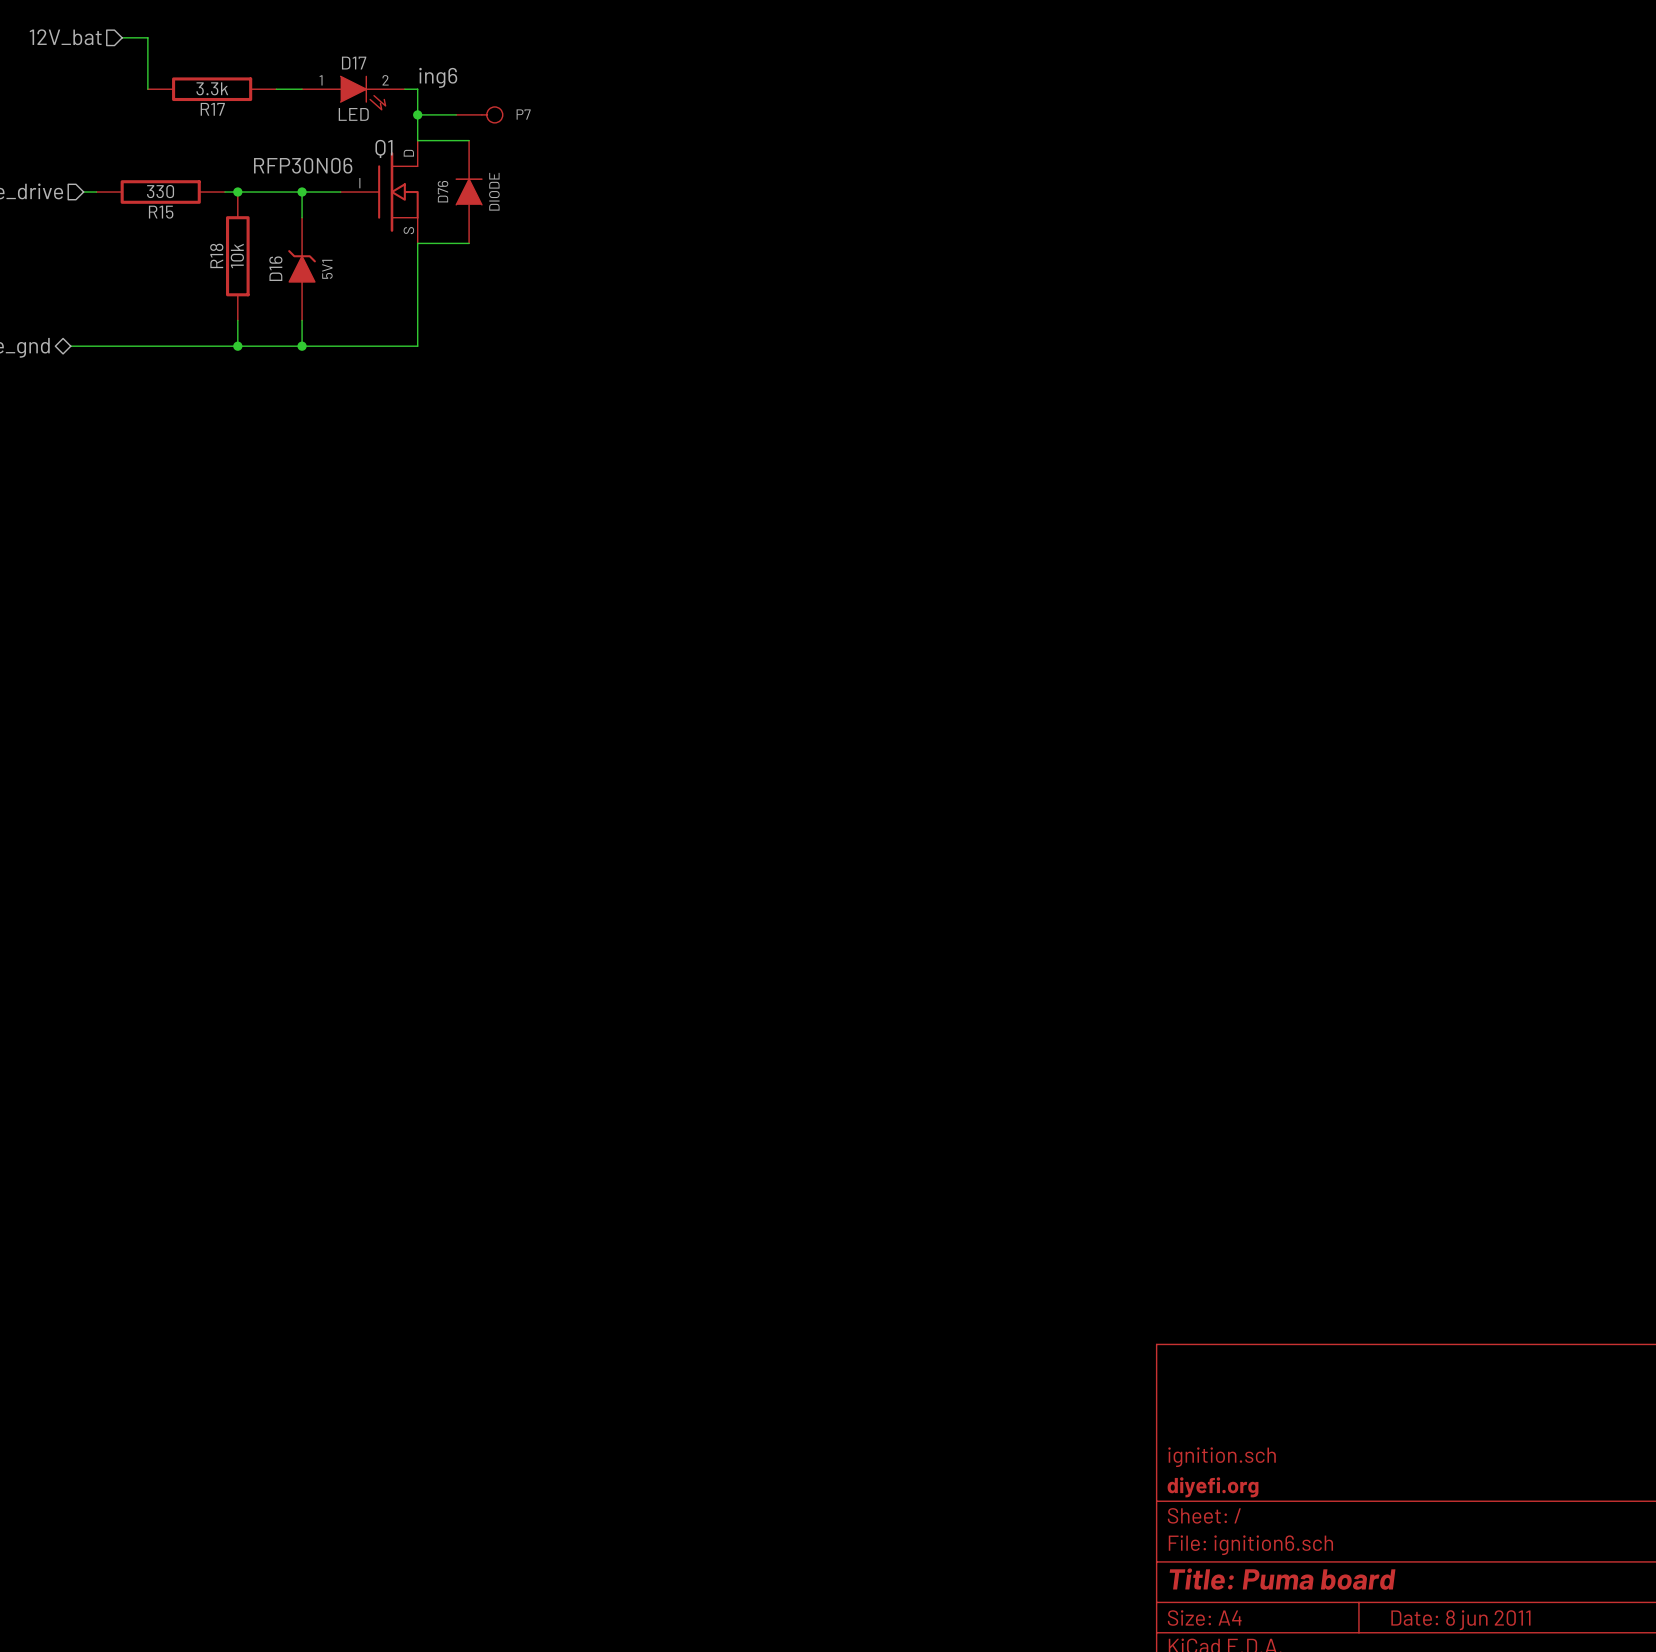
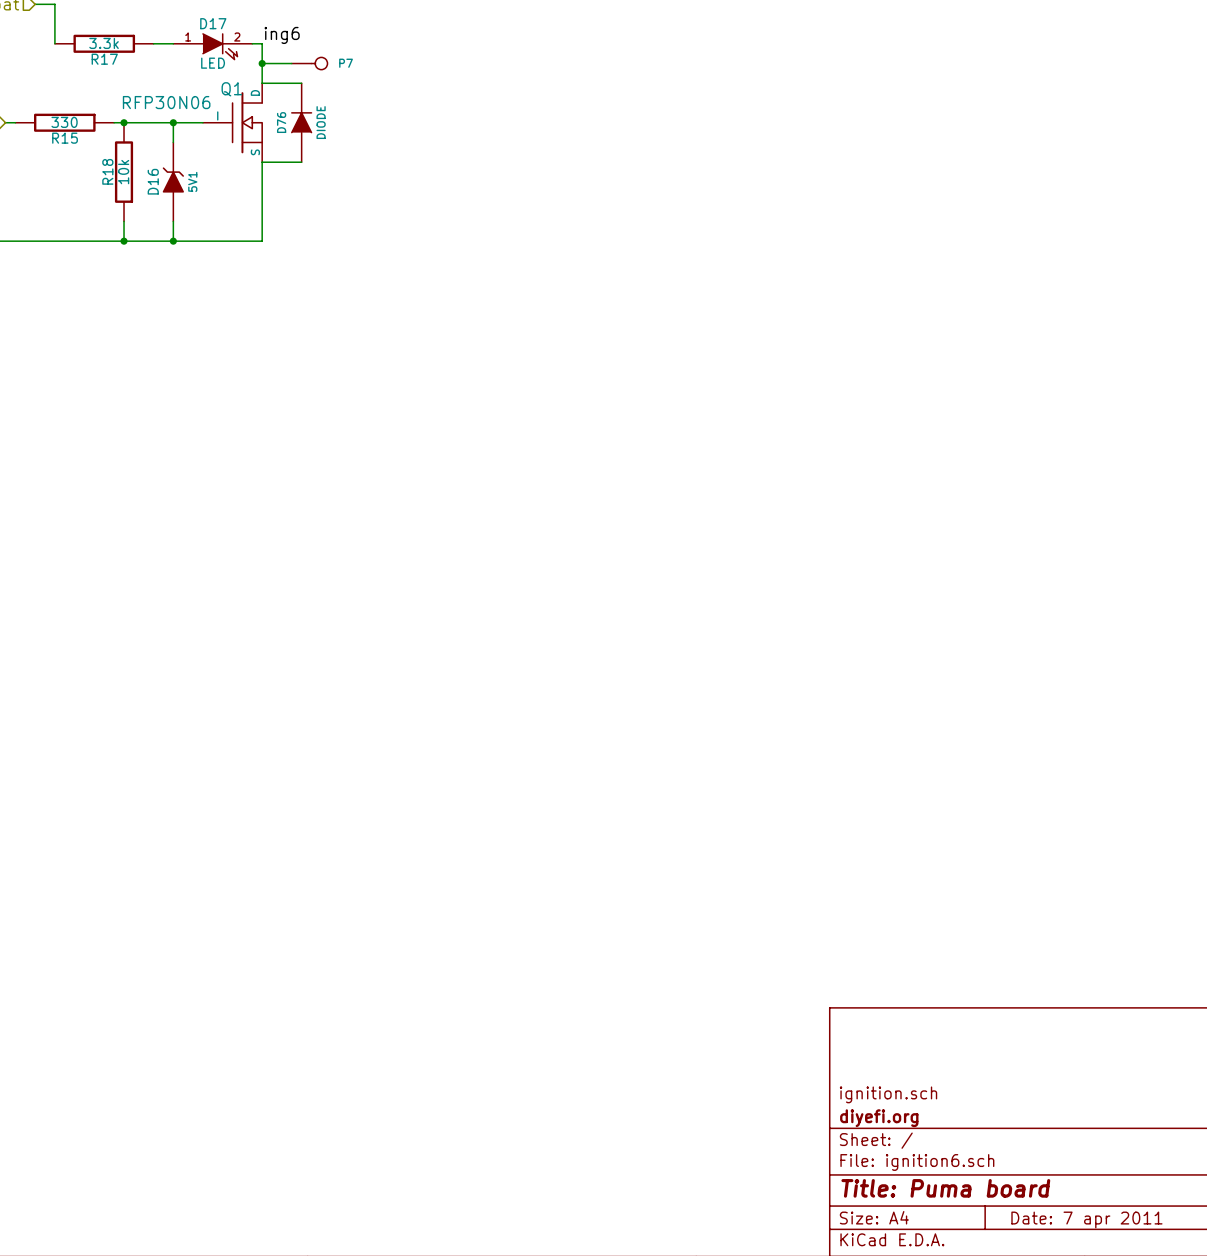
title block: Date: 8 jun 2011 (1460, 1620) -> Date: 7 apr 2011 (1086, 1219)

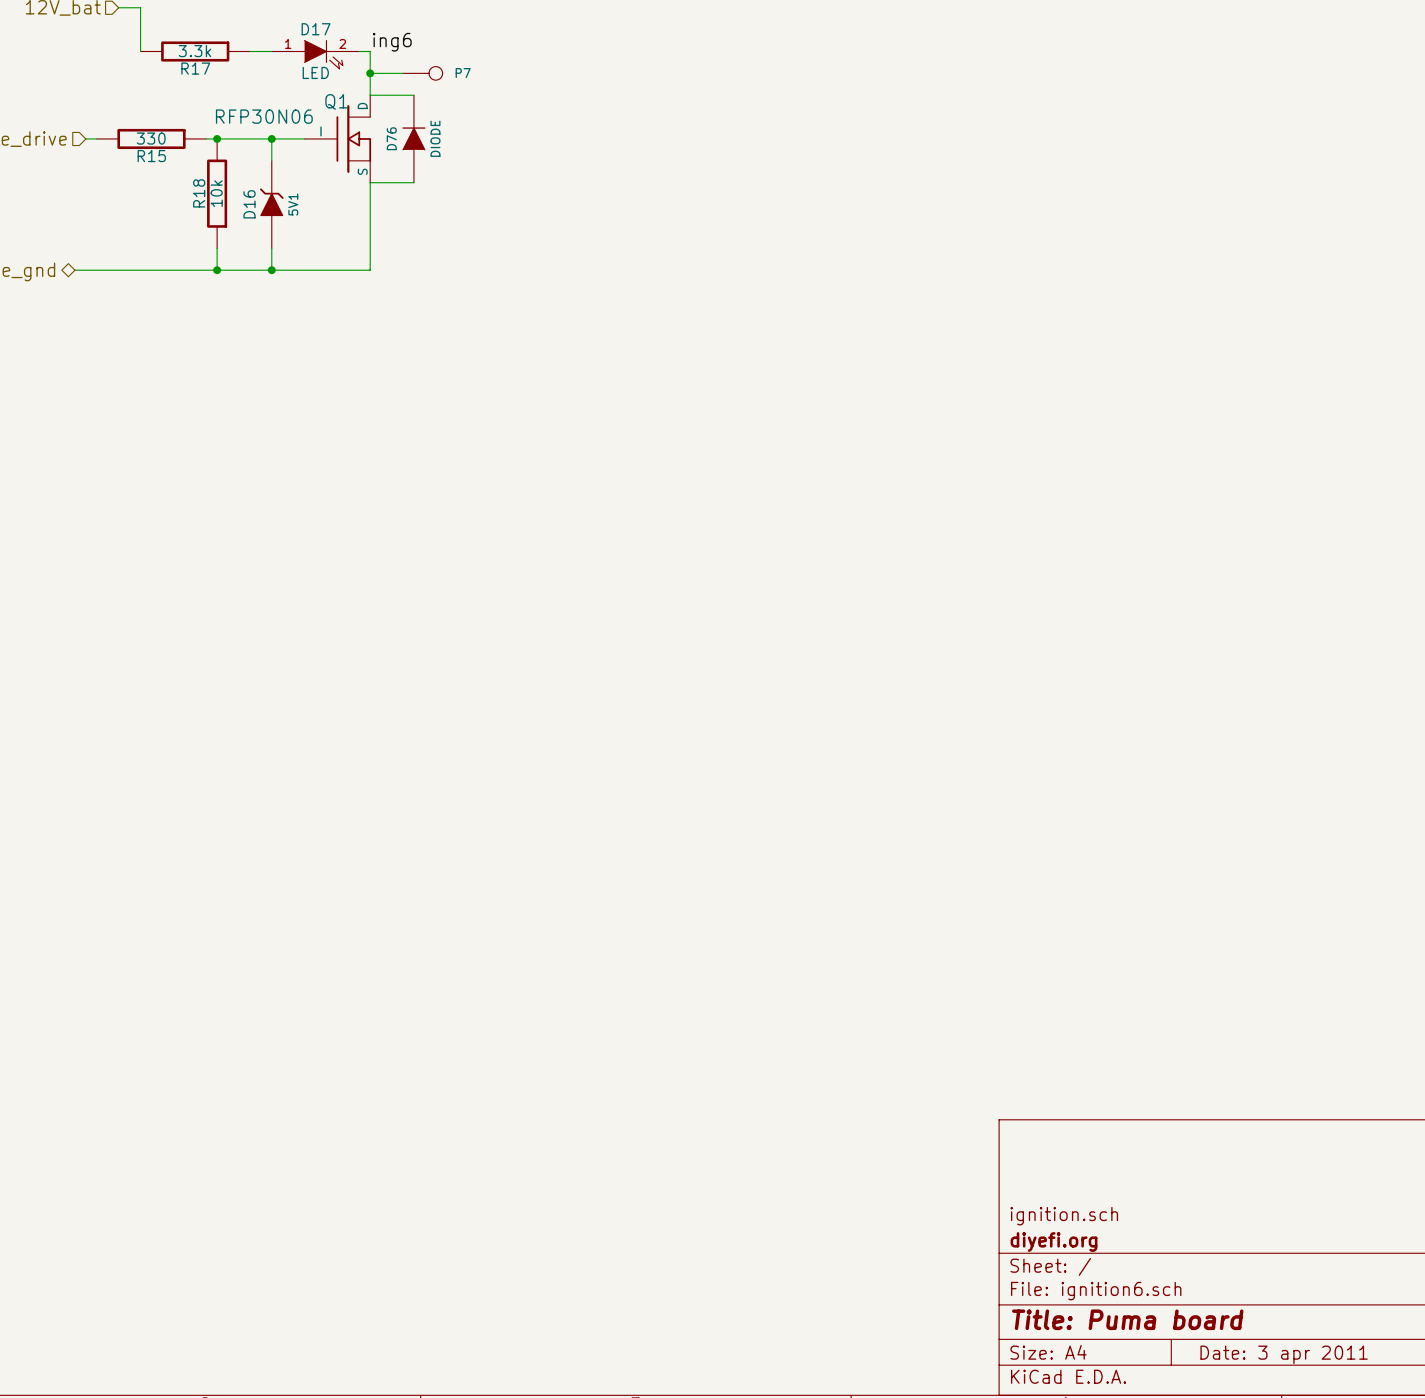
title block: Date: 7 apr 2011 (1086, 1219) -> Date: 3 apr 2011 (1284, 1354)

